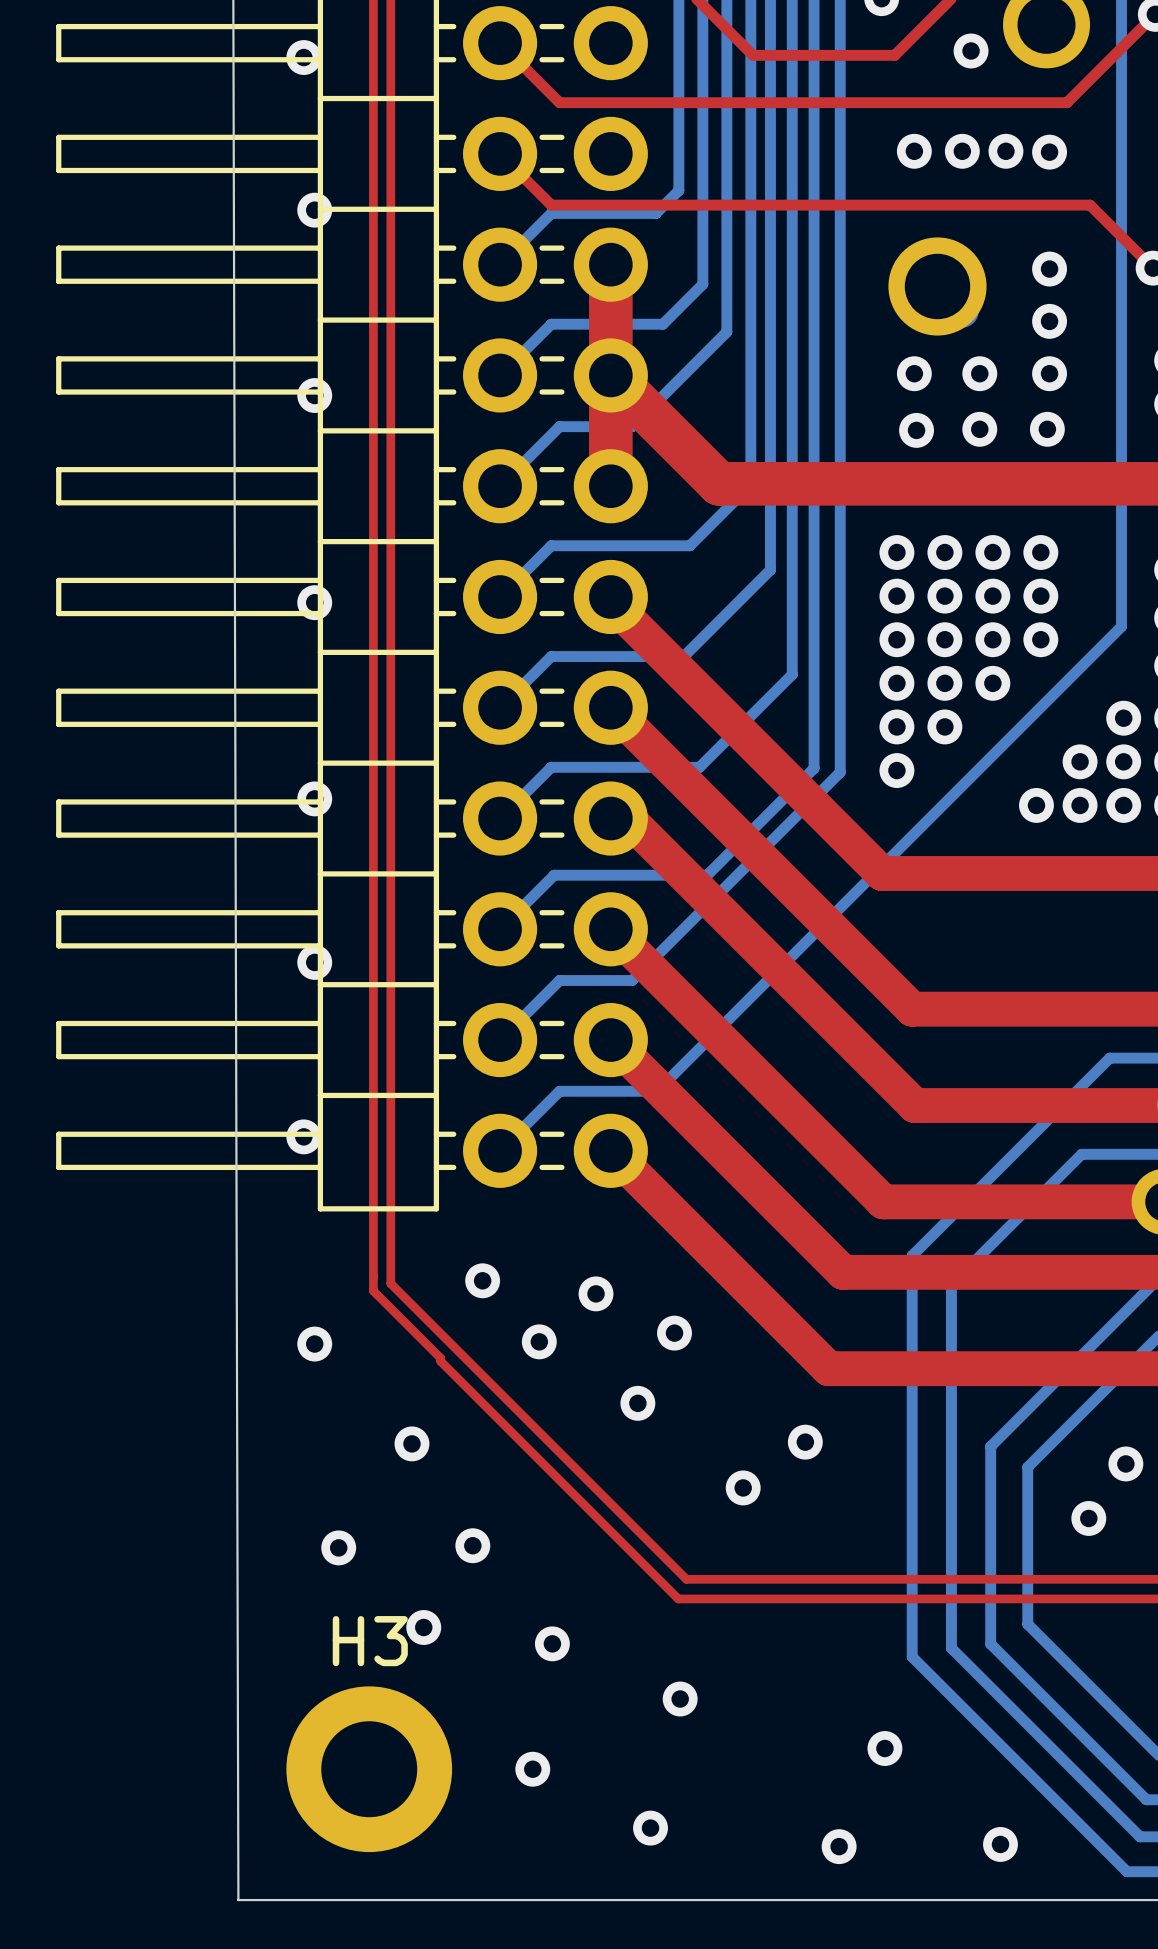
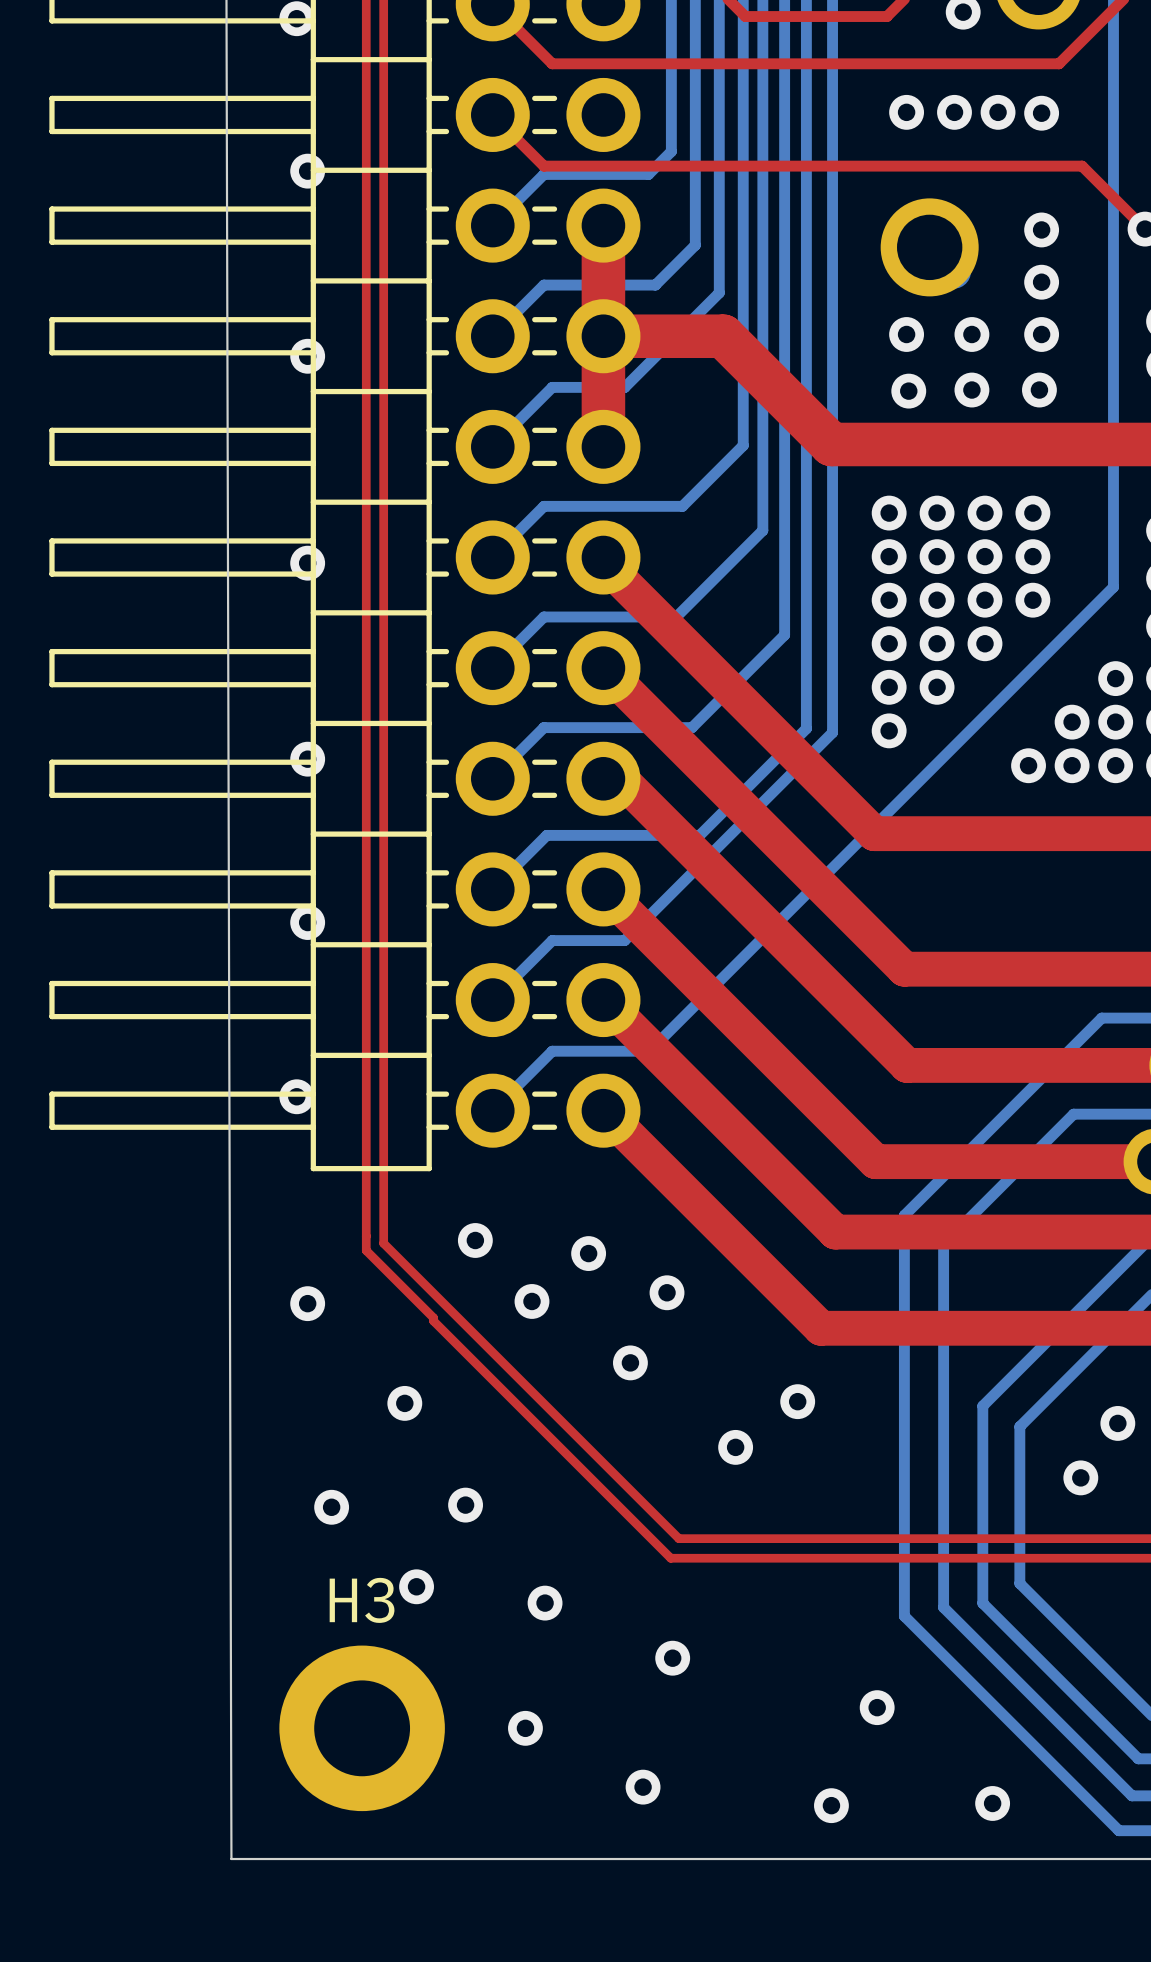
top track: (610, 375) (719, 483) (839, 483) -> (603, 336) (723, 336) (831, 444)

